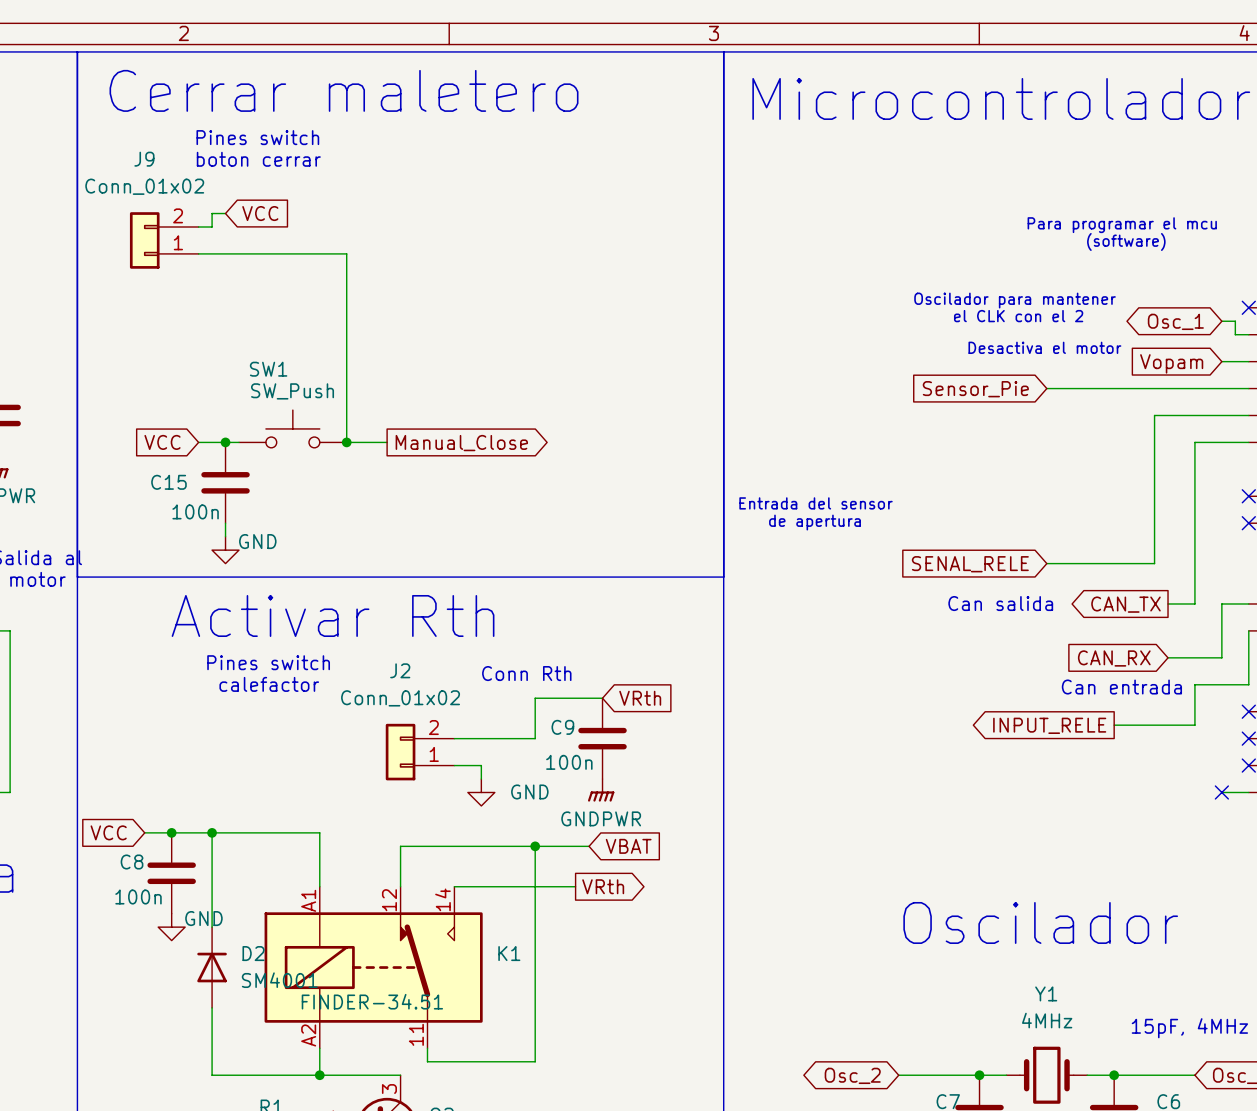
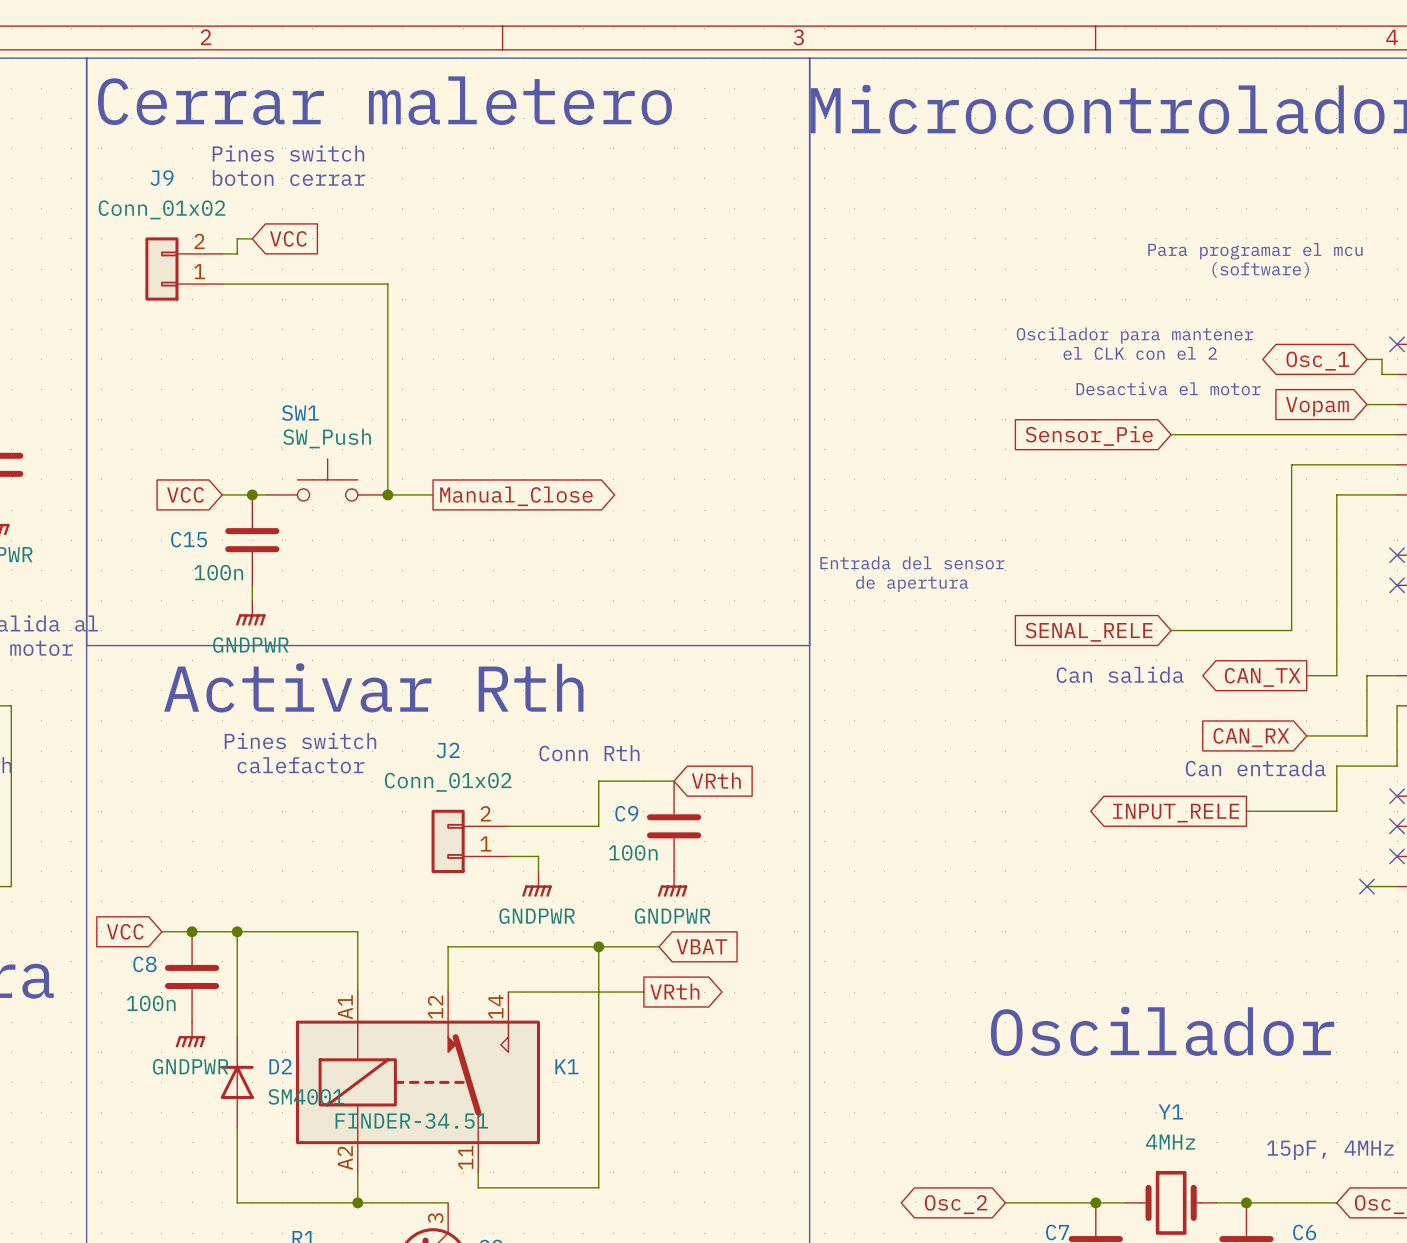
power symbol: GND (225, 550) -> GNDPWR (250, 613)
power symbol: GND (481, 792) -> GNDPWR (536, 884)
power symbol: GND (171, 927) -> GNDPWR (190, 1034)

